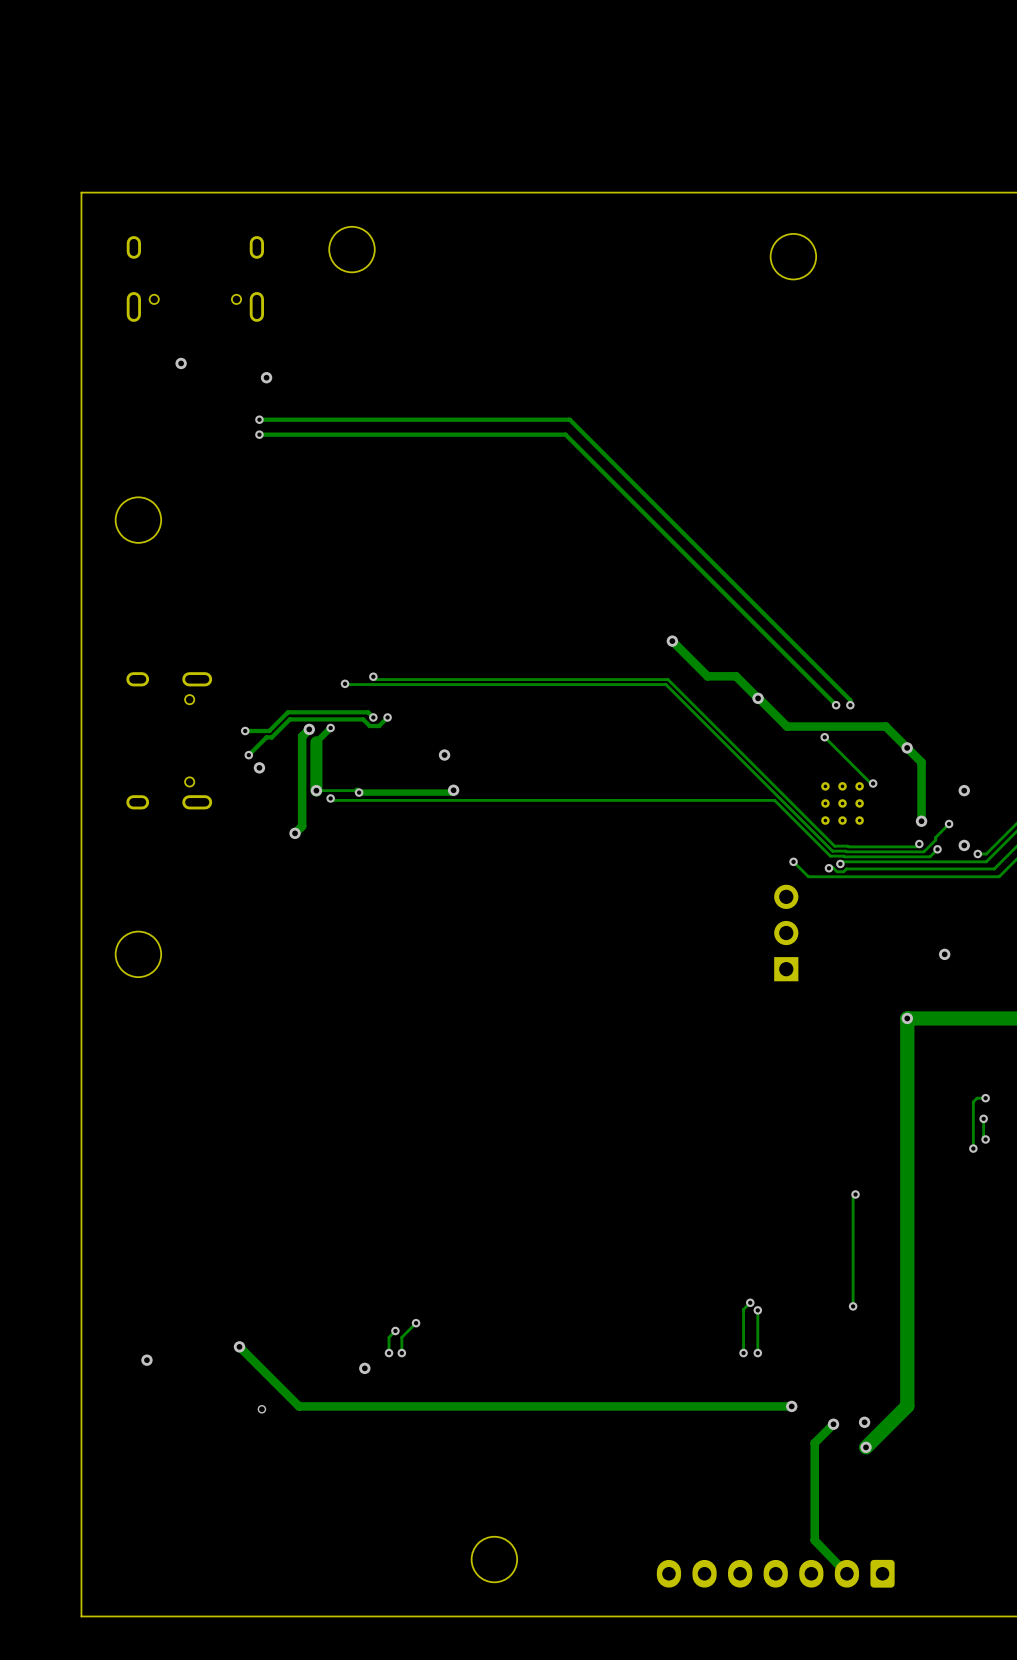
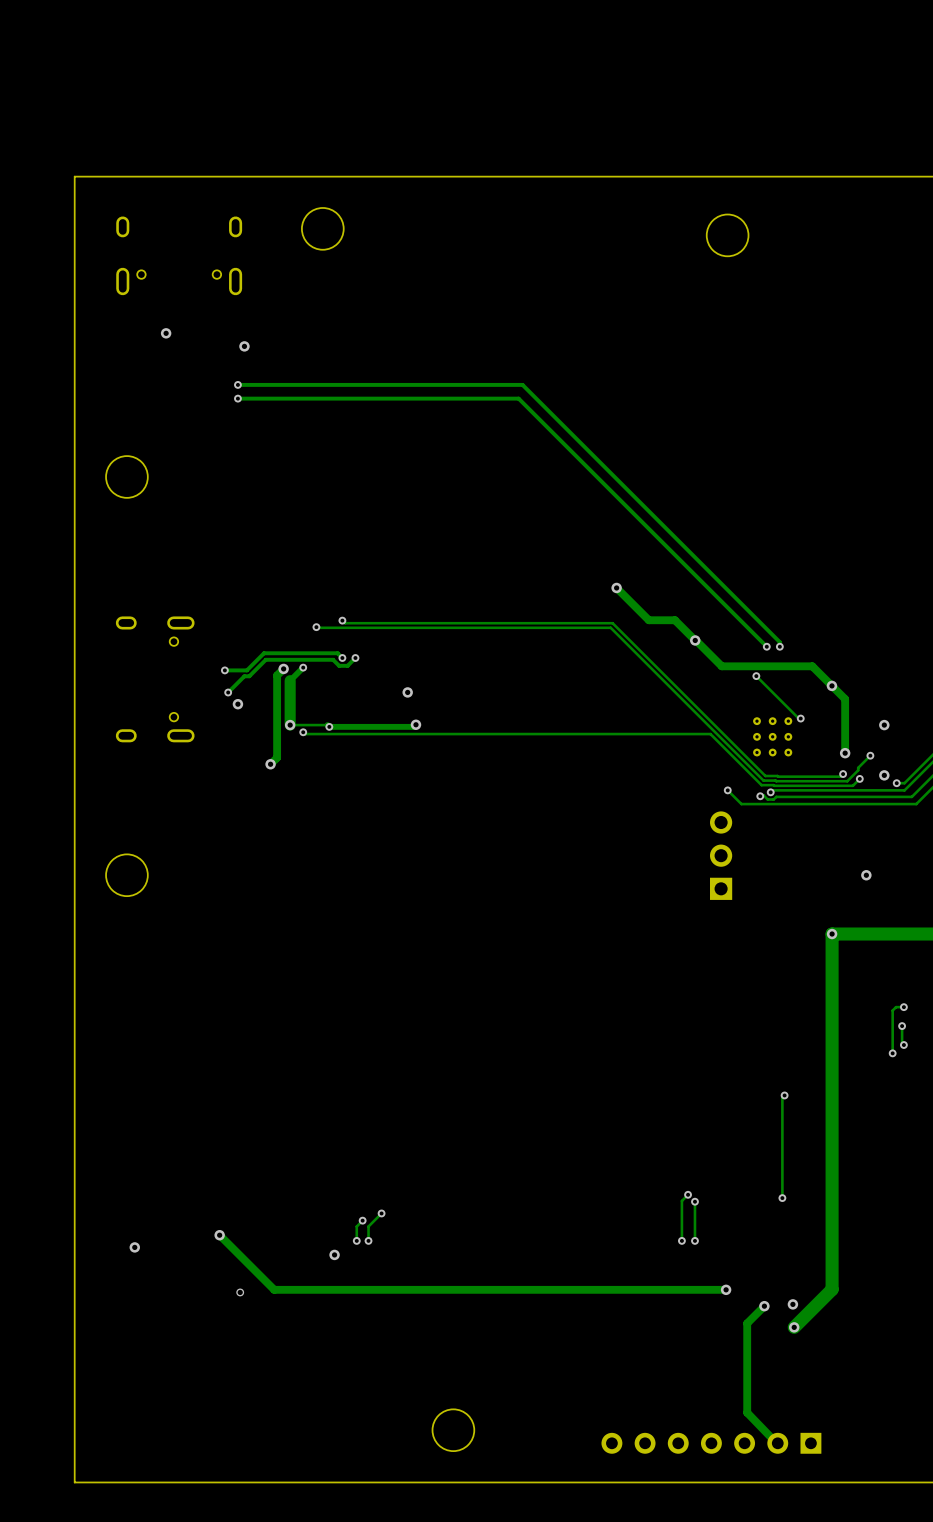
part footprint: [656, 1559, 895, 1588] -> [601, 1432, 822, 1454]

